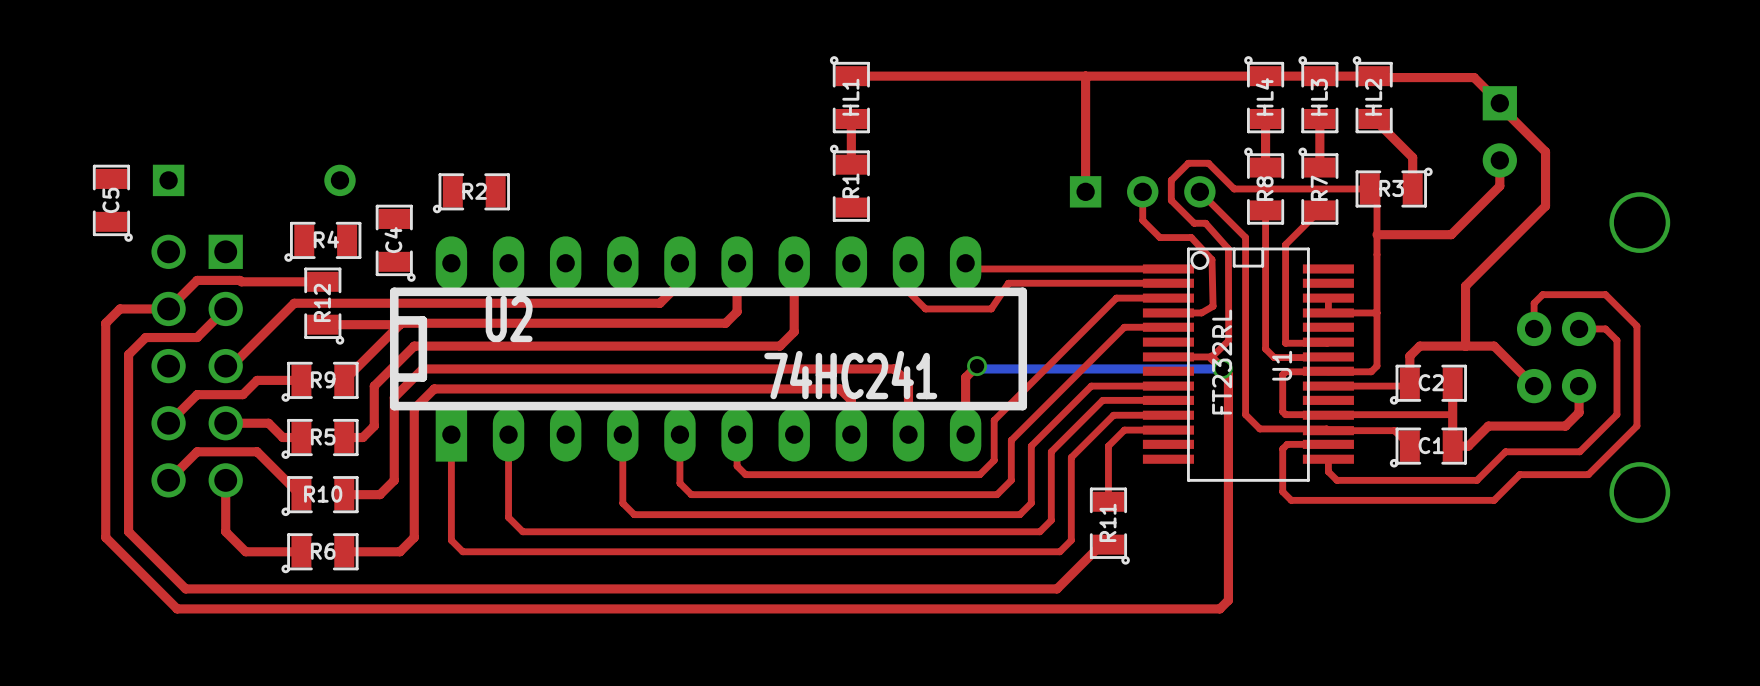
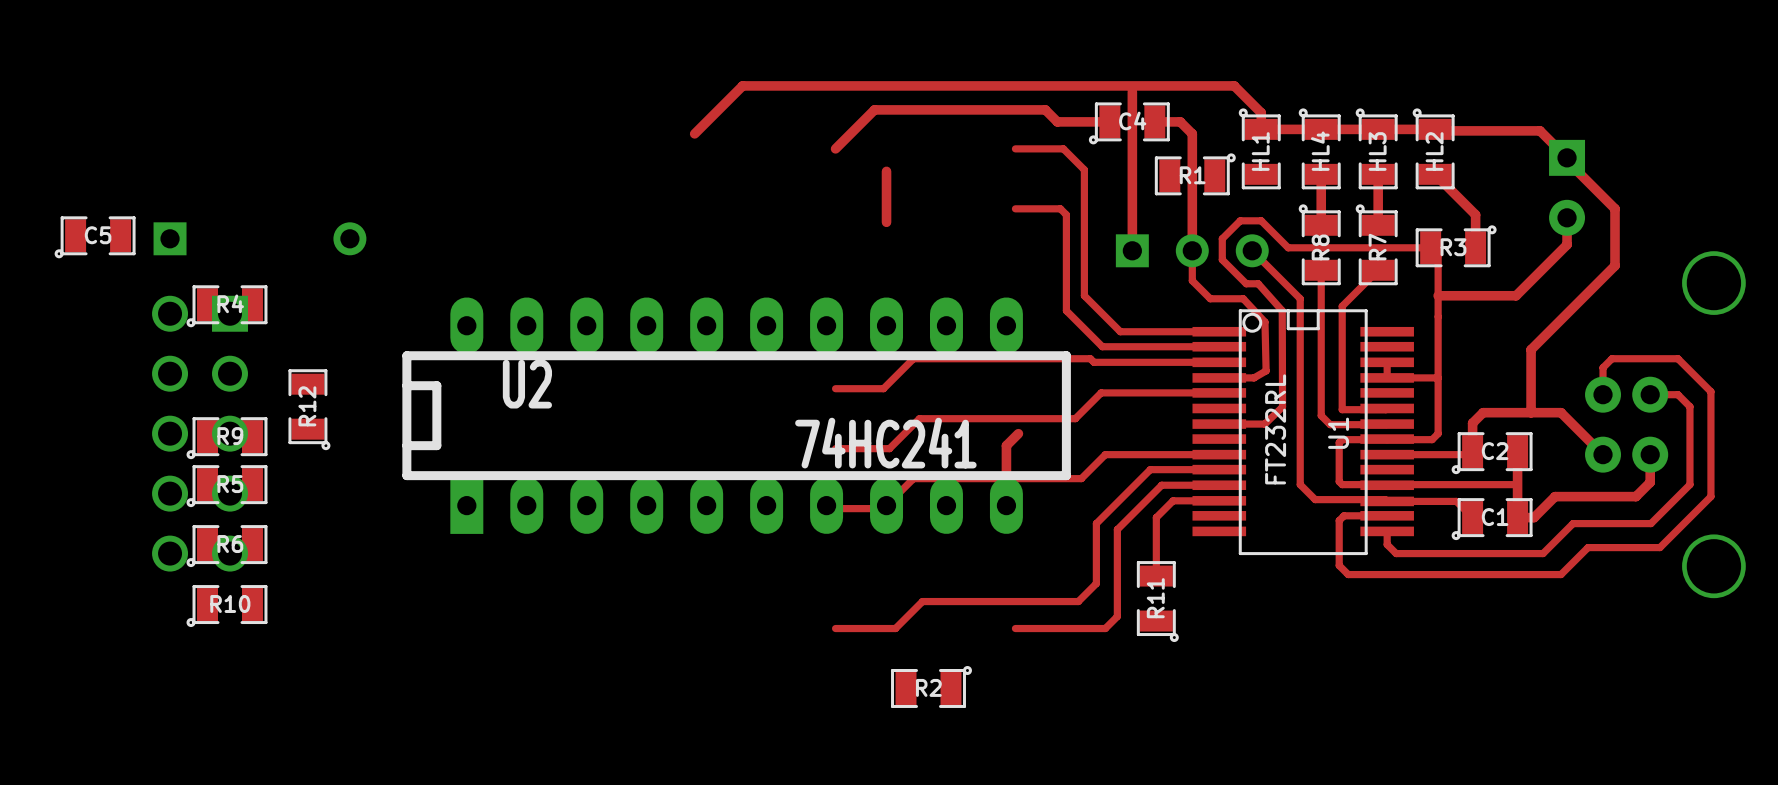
top track: none -> (1132, 91) (1132, 129)
top track: none -> (1109, 121) (1057, 121) (1045, 109) (874, 109) (835, 148)
top track: none -> (1154, 121) (1180, 121) (1192, 133) (1192, 250)
top track: (851, 76) (1208, 76) -> (694, 133) (742, 85) (1234, 85) (1261, 112) (1261, 129)
HL1 position: (849, 94) -> (1259, 148)
R1 rotation: 0° (849, 183) -> 90° clockwise (1195, 174)
R1 position: (849, 183) -> (1195, 174)
R2 rotation: 0° (471, 193) -> 180° (931, 686)
R2 position: (471, 193) -> (931, 686)
C5 rotation: 0° (112, 203) -> 90° clockwise (95, 237)
R4 position: (322, 241) -> (227, 306)
C4 rotation: 0° (395, 243) -> 90° clockwise (1129, 123)
C4 position: (395, 243) -> (1129, 123)
top track: (679, 263) (679, 283) (659, 303) (294, 303) (231, 366) (225, 366) -> none
top track: (737, 263) (737, 311) (725, 323) (401, 323) (344, 380) -> none
top track: (794, 263) (794, 331) (779, 346) (414, 346) (374, 386) (374, 426) (362, 437) (344, 437) -> none
top track: (908, 263) (908, 291) (925, 308) (991, 308) (1008, 283) (1057, 283) -> (1015, 208) (1060, 208) (1066, 214) (1066, 310) (1102, 346)
top track: (965, 263) (971, 268) (1074, 268) -> (1015, 148) (1063, 148) (1084, 169) (1084, 295) (1120, 331)
top track: (322, 281) (197, 280) (168, 308) (120, 308) (105, 323) (105, 537) (177, 608) (1219, 608) (1228, 600) (1228, 374) (1211, 356) -> none
top track: (1116, 298) (994, 420) (994, 460) (979, 474) (745, 474) (737, 466) (737, 434) -> (1164, 362) (1093, 362) (1090, 358) (913, 358) (883, 388) (835, 388)
R12 position: (324, 306) -> (309, 409)
top track: (225, 308) (197, 337) (145, 337) (128, 354) (128, 531) (185, 588) (1057, 588) (1101, 544) (1108, 544) -> none
top track: (322, 324) (399, 324) -> none
top track: (1124, 327) (1011, 440) (1011, 480) (997, 494) (691, 494) (679, 483) (679, 434) -> (1173, 392) (1101, 392) (1075, 418) (919, 418) (889, 448) (835, 448)
bottom track: (977, 366) (979, 368) (1222, 368) -> none
via: (977, 366) -> none
via: (1222, 368) -> none
top track: (301, 380) (257, 380) (242, 394) (197, 394) (168, 423) -> none
R9 position: (319, 381) -> (227, 438)
top track: (1091, 386) (1031, 446) (1031, 503) (1019, 514) (634, 514) (622, 503) (622, 434) -> (1138, 454) (1105, 454) (1081, 478) (913, 478) (883, 508) (835, 508)
top track: (225, 423) (268, 423) (282, 437) (301, 437) -> none
top track: (451, 434) (451, 540) (462, 551) (802, 551) -> none
top track: (508, 434) (508, 517) (522, 531) (1039, 531) (1051, 520) (1051, 508) -> none
top track: (851, 434) (851, 400) (839, 388) (434, 388) (414, 408) (414, 537) (399, 551) (344, 551) -> none
top track: (908, 434) (908, 383) (894, 368) (422, 368) (394, 397) (394, 480) (379, 494) (344, 494) -> none
R5 position: (319, 438) -> (227, 486)
top track: (168, 480) (197, 451) (257, 451) (301, 494) -> none
top track: (225, 480) (225, 531) (245, 551) (301, 551) -> none
R10 position: (319, 496) -> (227, 606)
top track: (859, 551) (974, 551) -> (895, 628) (922, 601) (1078, 601) (1096, 583)
R6 position: (319, 553) -> (227, 546)

